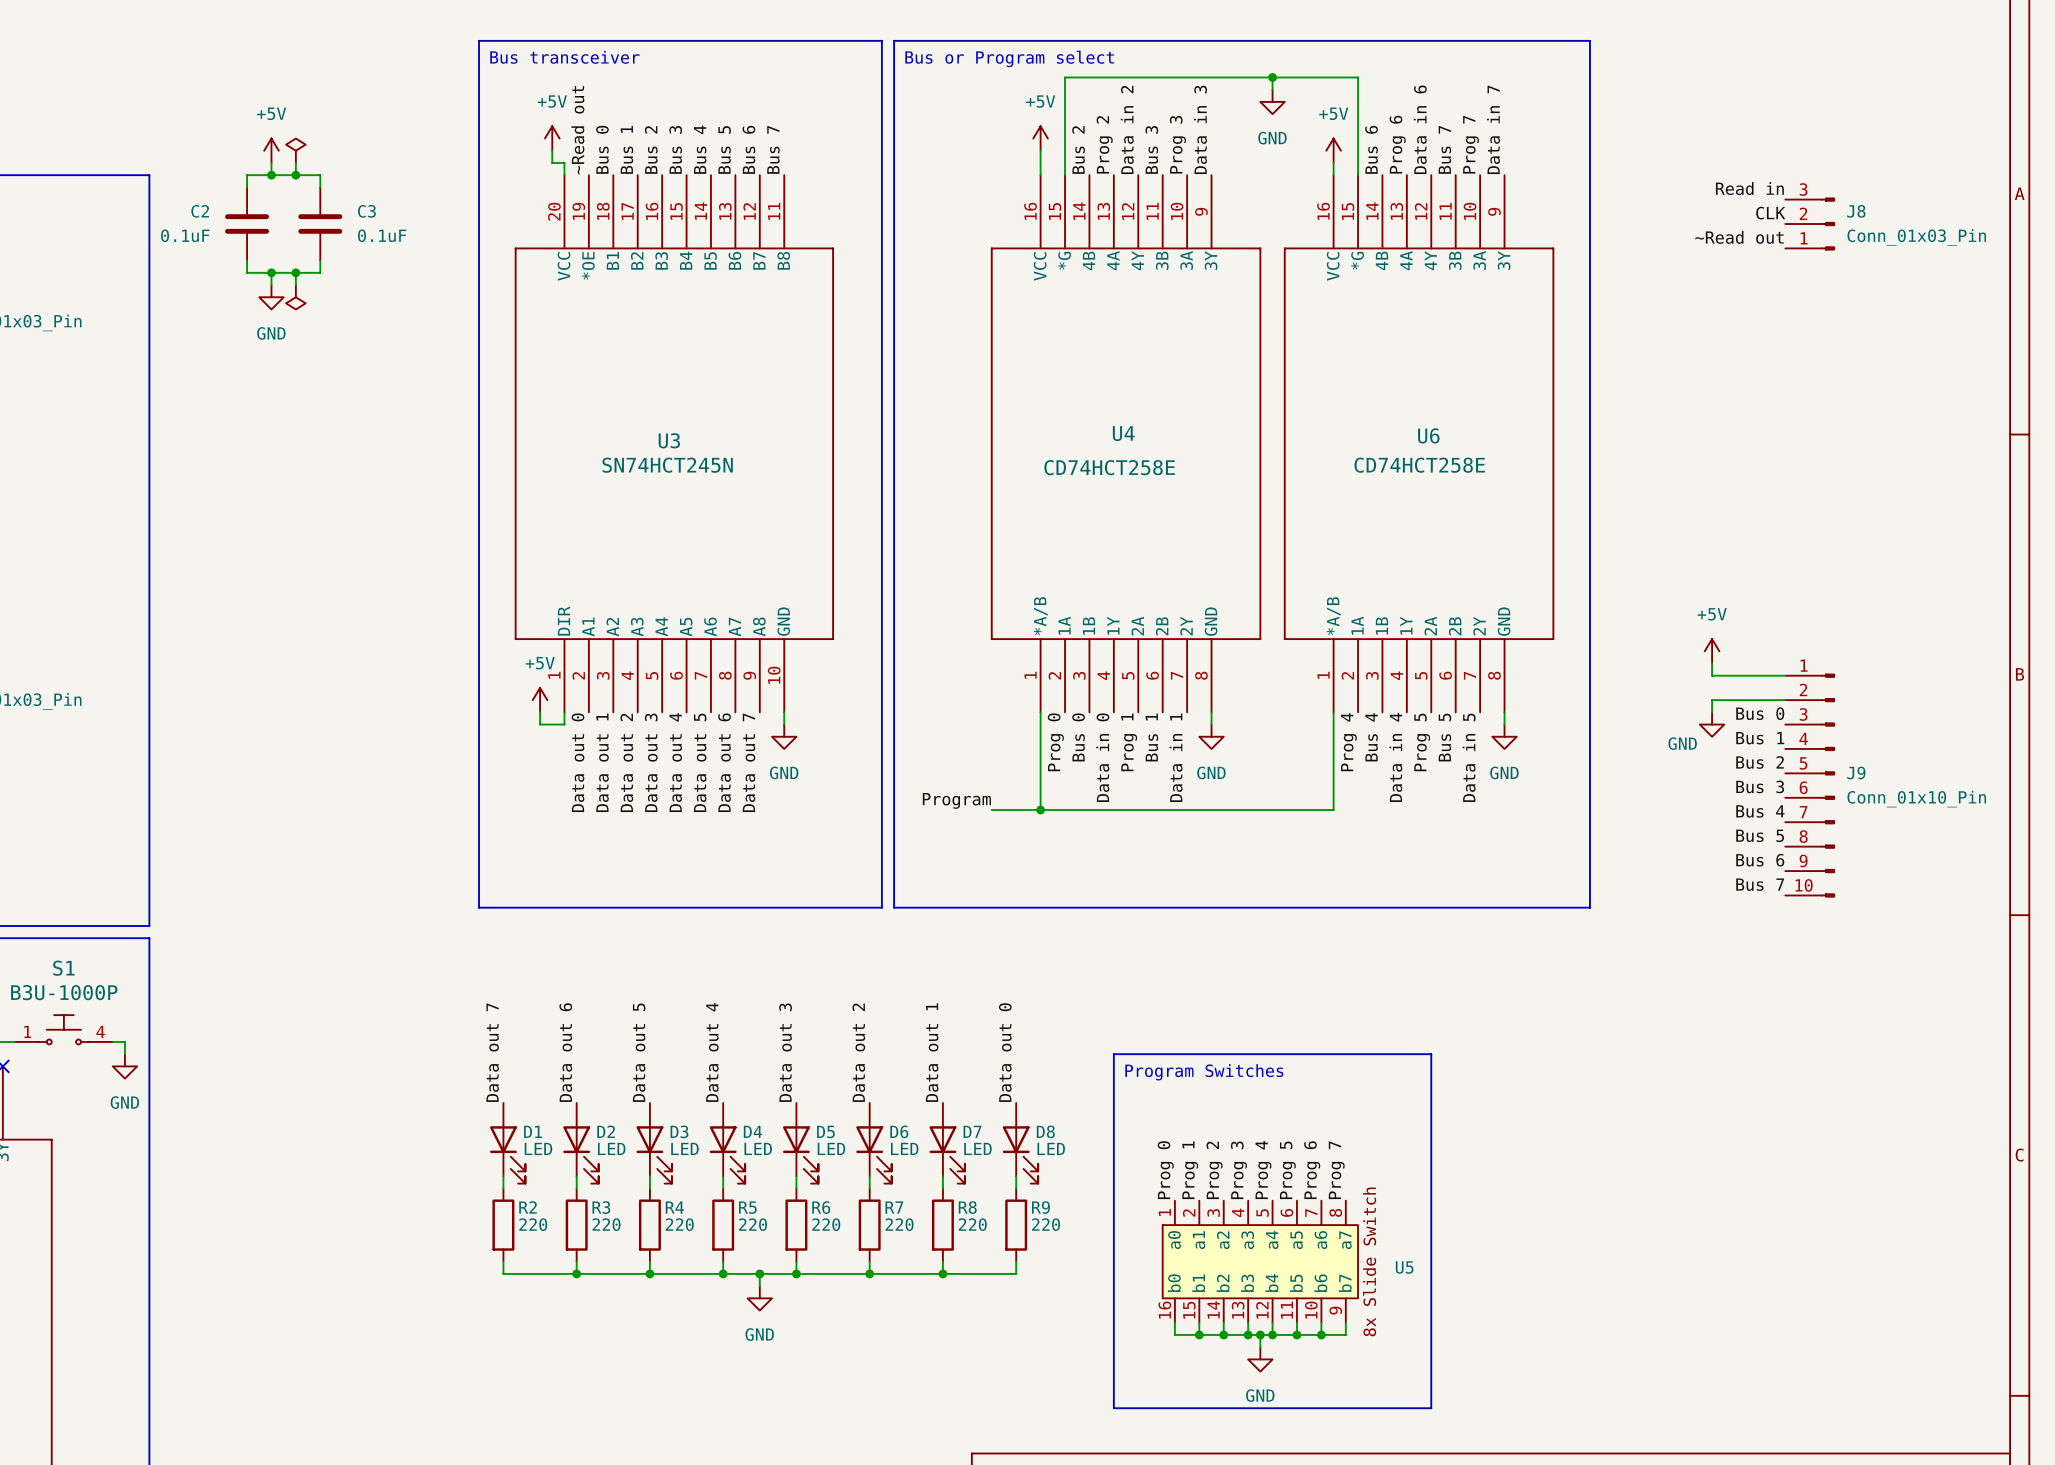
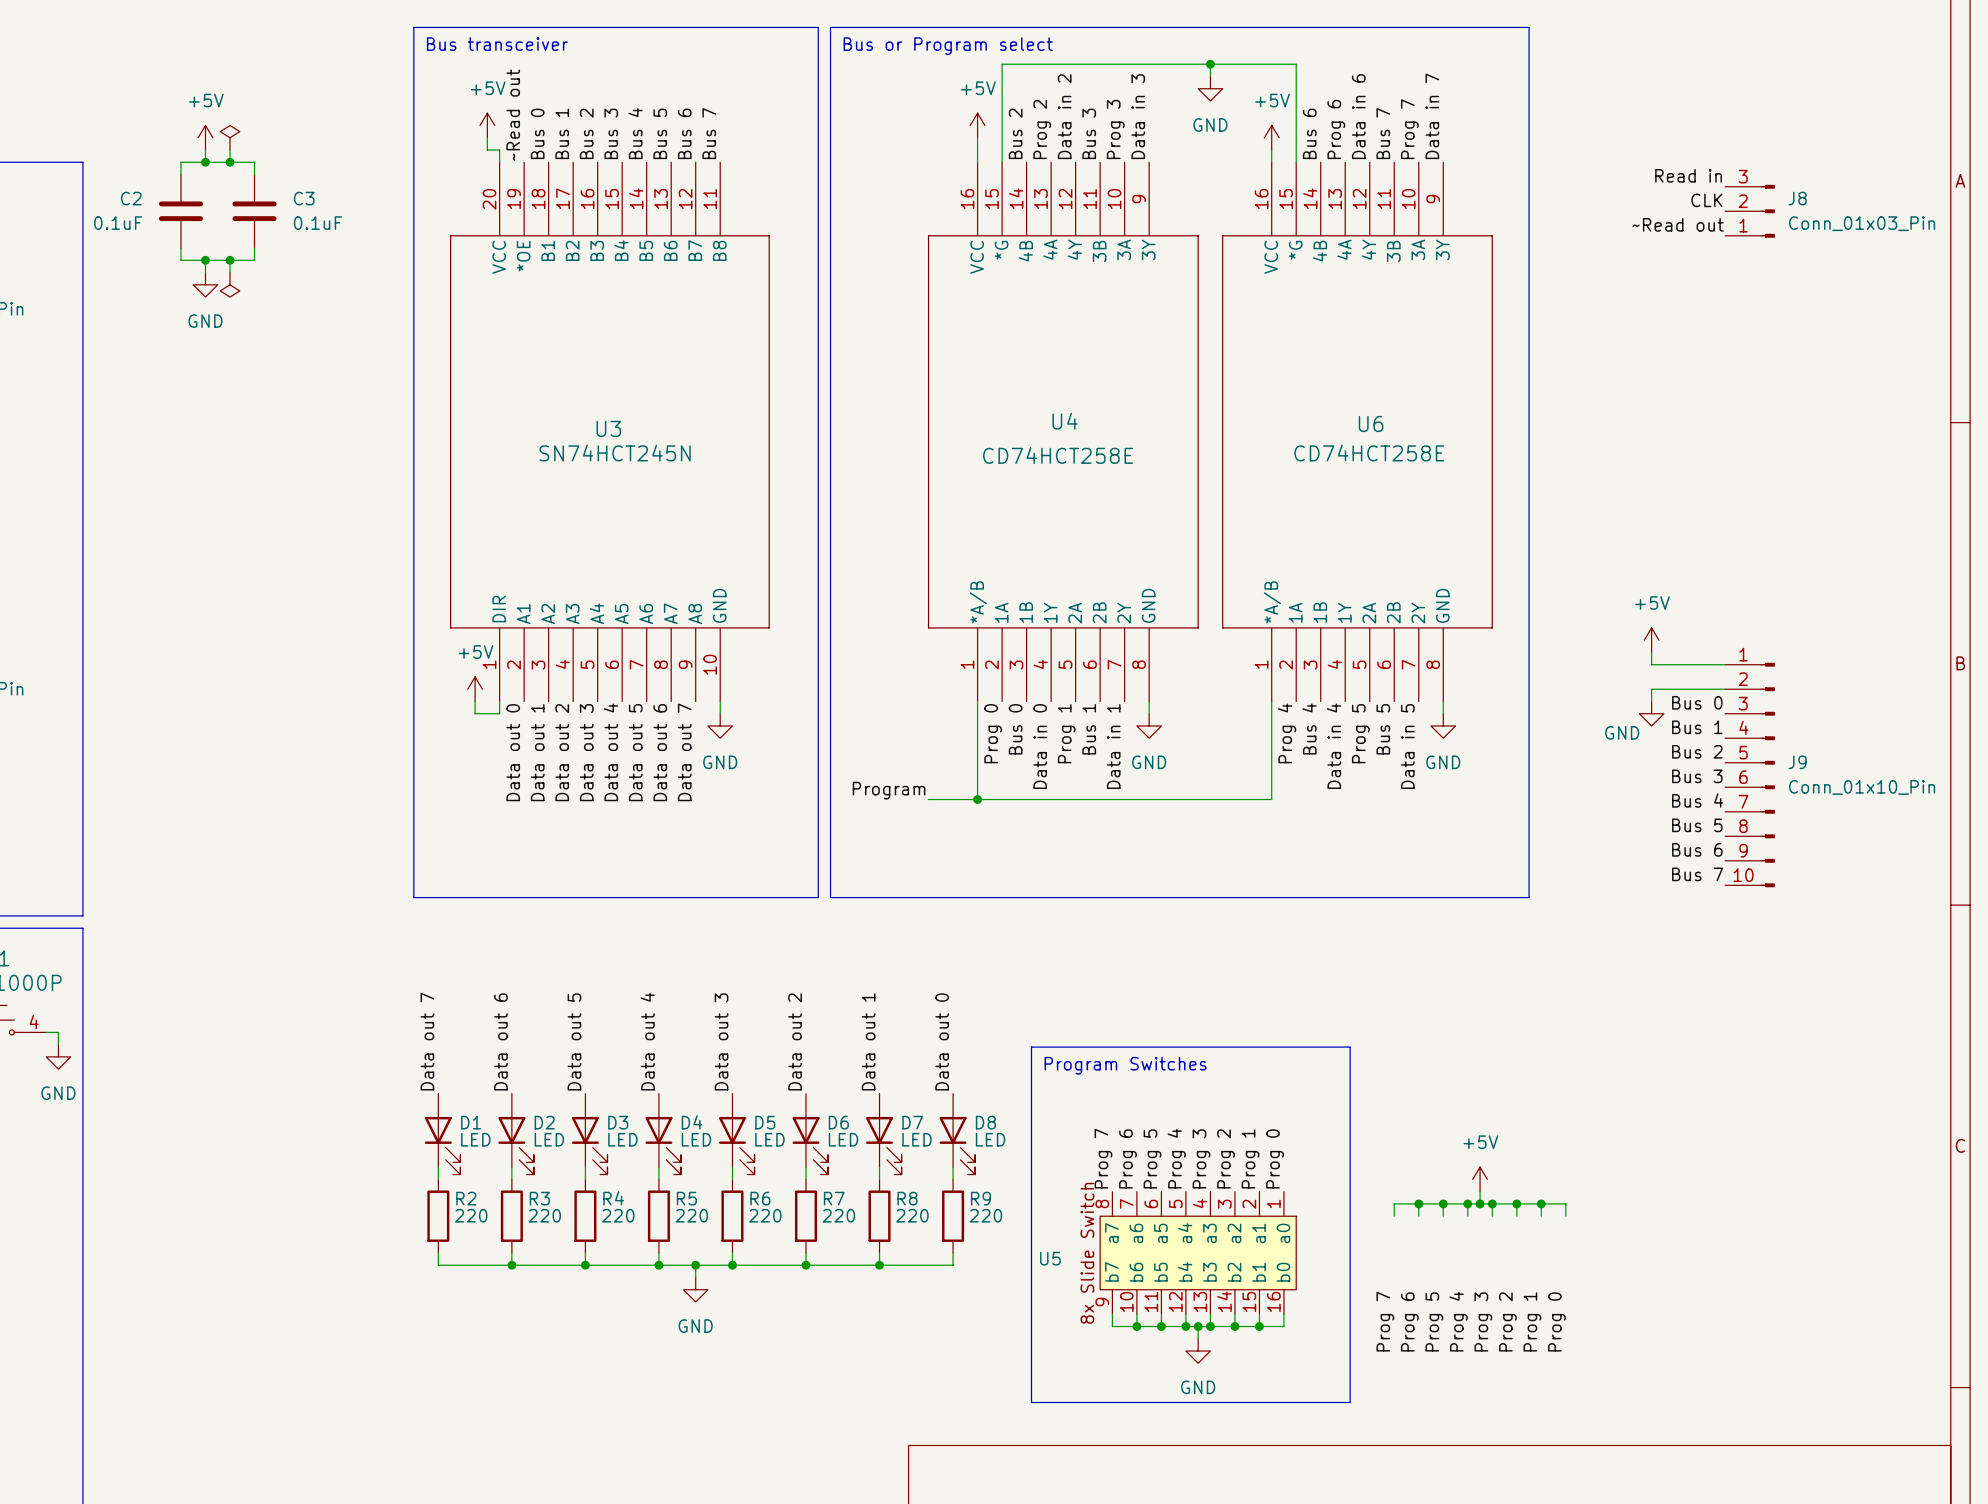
line: (1113, 1054) (1431, 1054) (1431, 1408) (1113, 1408) (1113, 1054) -> (1031, 1047) (1350, 1047) (1350, 1402) (1031, 1402) (1031, 1047)
text position: Program Switches (1204, 1072) -> Program Switches (1125, 1065)
label: Prog 0 (1165, 1170) -> Prog 7 (1103, 1158)
label: Prog 1 (1190, 1170) -> Prog 6 (1128, 1158)
label: Prog 2 (1214, 1170) -> Prog 5 (1152, 1158)
label: Prog 3 (1238, 1170) -> Prog 4 (1176, 1158)
label: Prog 4 (1263, 1170) -> Prog 3 (1201, 1158)
label: Prog 5 (1287, 1170) -> Prog 2 (1226, 1158)
label: Prog 6 (1312, 1170) -> Prog 1 (1250, 1158)
label: Prog 7 (1336, 1170) -> Prog 0 (1275, 1158)
power symbol: none -> +5V (1480, 1179)
wire: none -> (1480, 1191) (1480, 1203)
wire: none -> (1418, 1203) (1418, 1216)
junction: none -> (1418, 1203)
wire: none -> (1443, 1203) (1443, 1216)
junction: none -> (1443, 1203)
wire: none -> (1467, 1203) (1467, 1216)
junction: none -> (1467, 1203)
junction: none -> (1480, 1203)
wire: none -> (1492, 1203) (1492, 1216)
junction: none -> (1492, 1203)
wire: none -> (1516, 1203) (1516, 1216)
junction: none -> (1516, 1203)
wire: none -> (1541, 1203) (1541, 1216)
junction: none -> (1541, 1203)
wire: none -> (1394, 1216) (1394, 1203) (1565, 1203) (1565, 1216)
U5 flip: as is (1260, 1261) -> left-right (1198, 1252)
label: none -> Prog 7 (1385, 1321)
label: none -> Prog 6 (1409, 1321)
label: none -> Prog 5 (1434, 1321)
label: none -> Prog 4 (1458, 1321)
label: none -> Prog 3 (1483, 1321)
label: none -> Prog 2 (1507, 1321)
label: none -> Prog 1 (1532, 1321)
label: none -> Prog 0 (1556, 1321)

